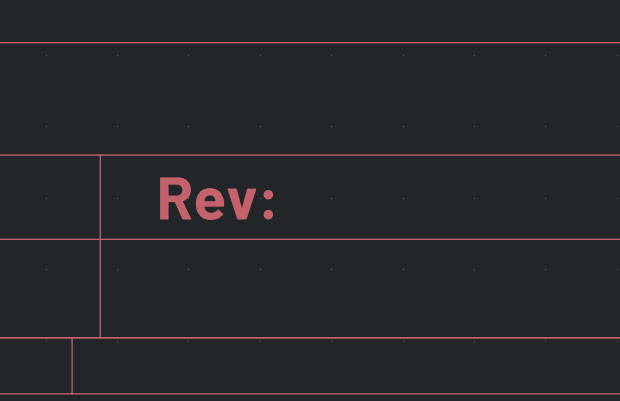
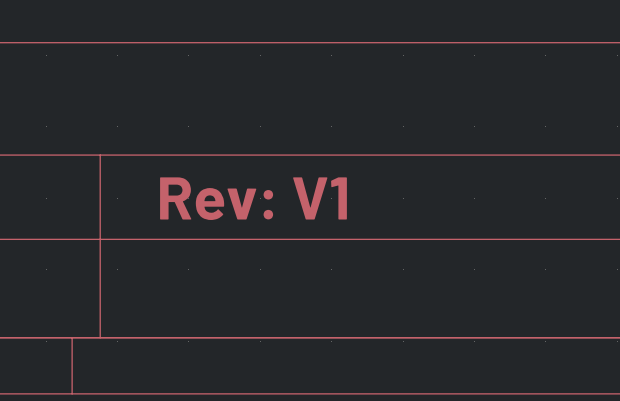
title block: Rev: (216, 198) -> Rev: V1 (253, 198)

